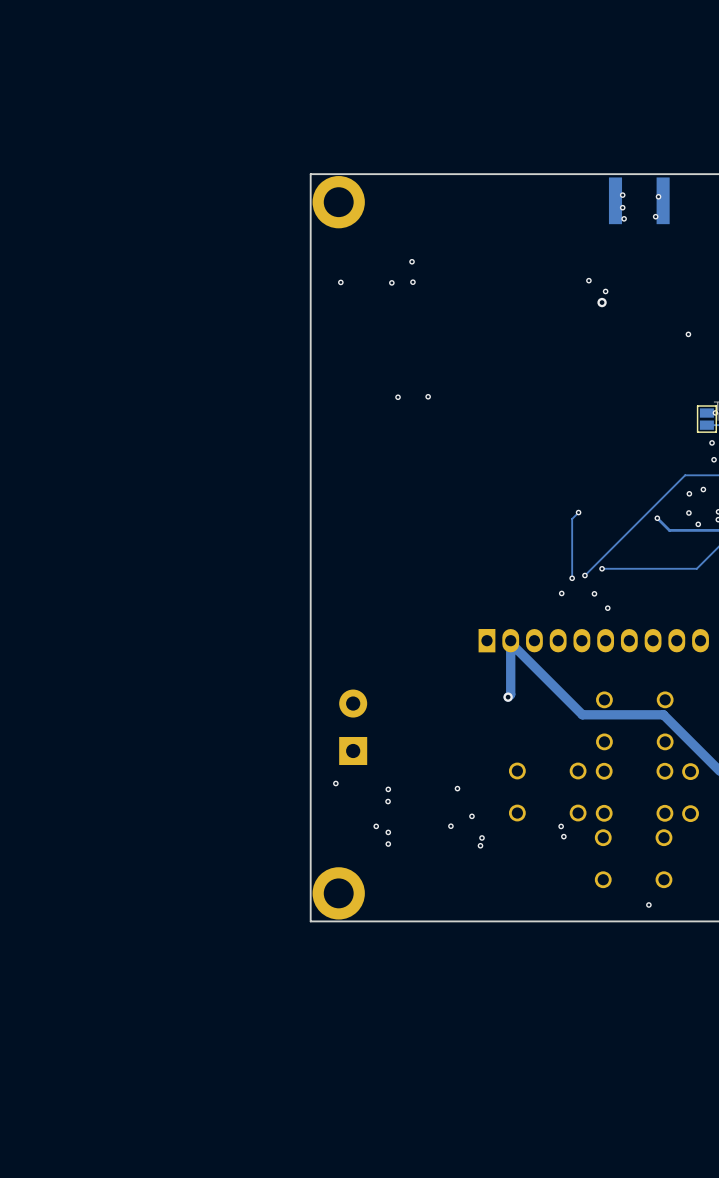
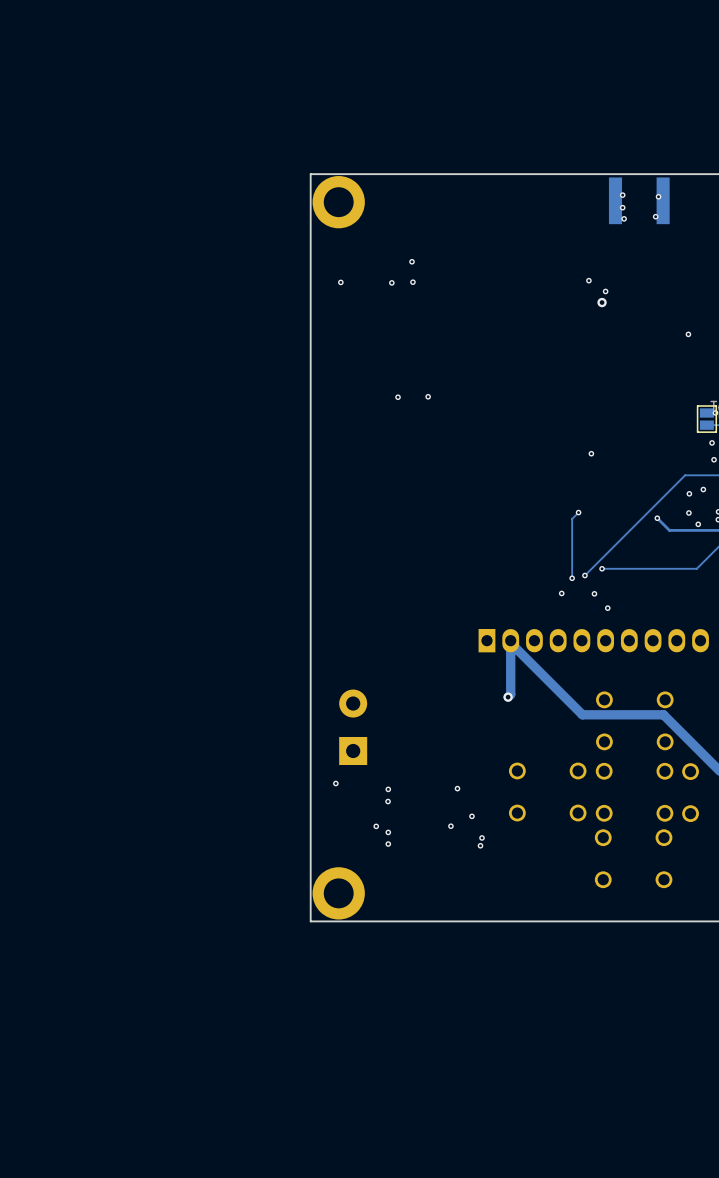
via: none -> (591, 453)
via: (561, 826) -> none
via: (563, 836) -> none
via: (648, 904) -> none

